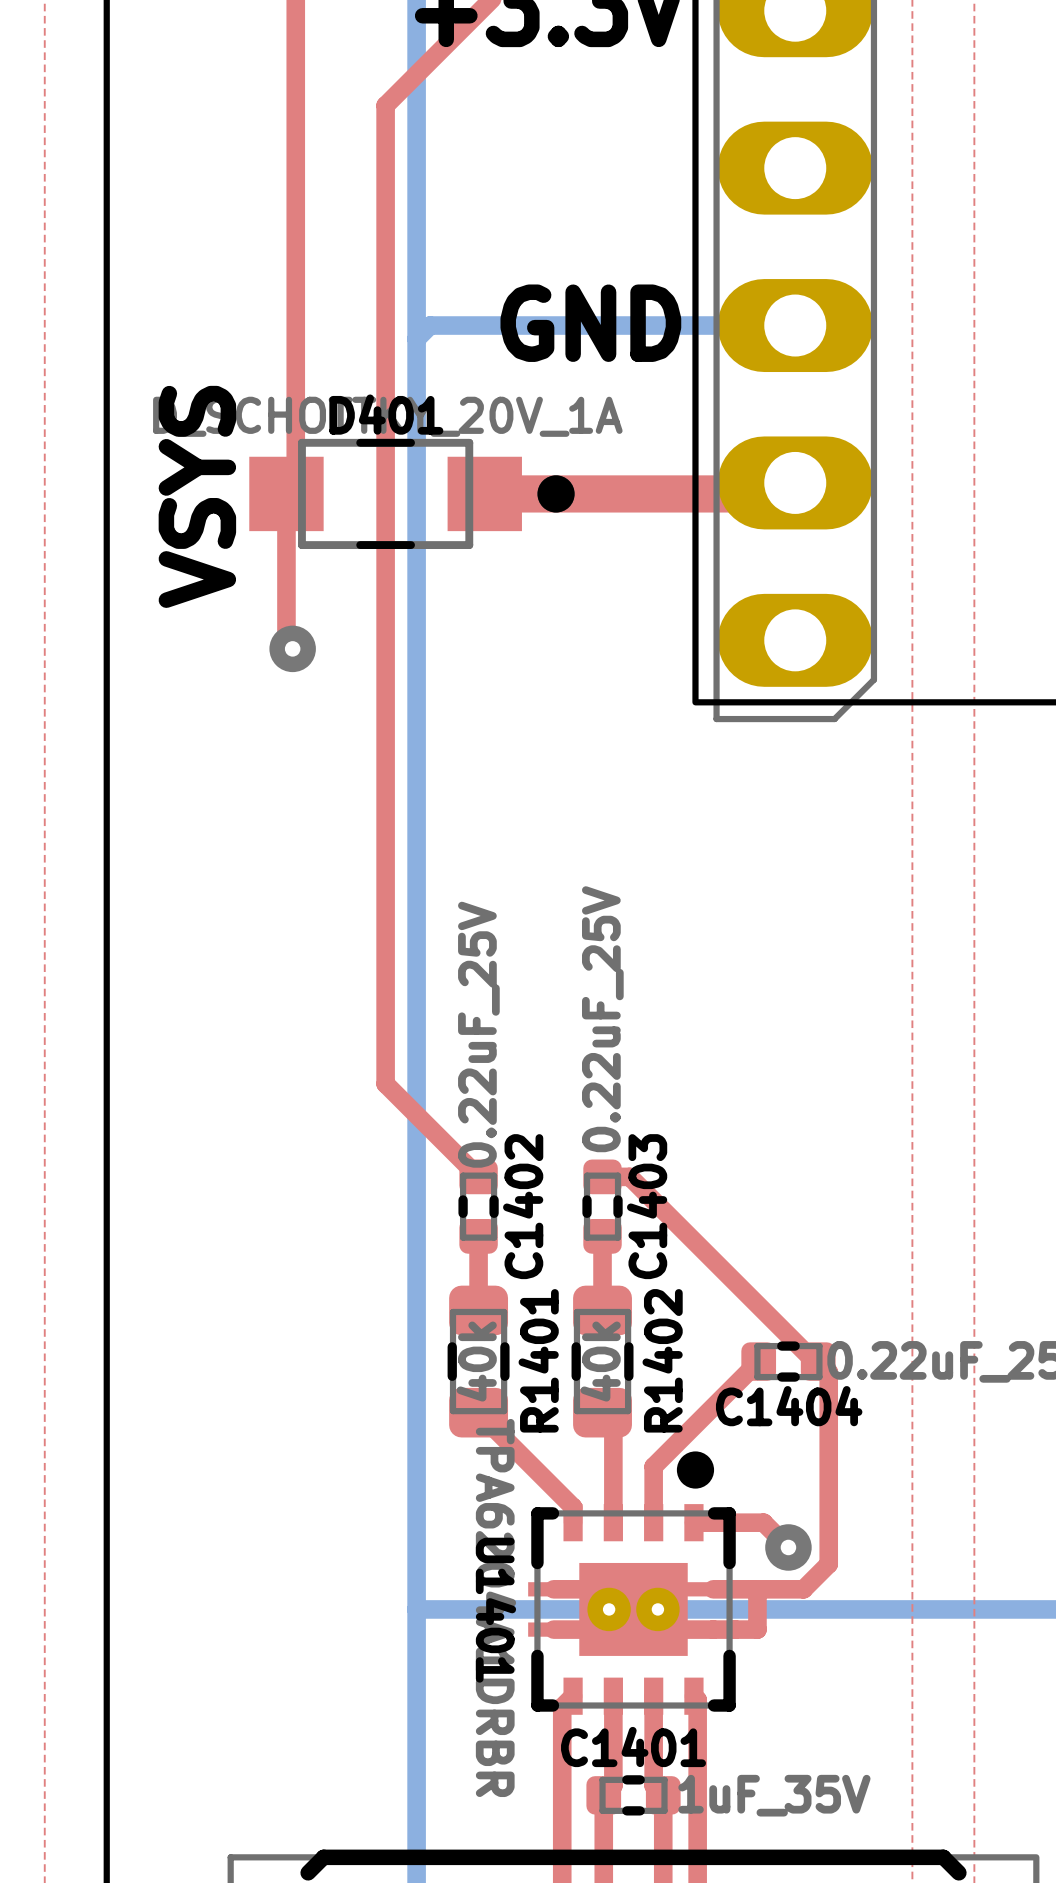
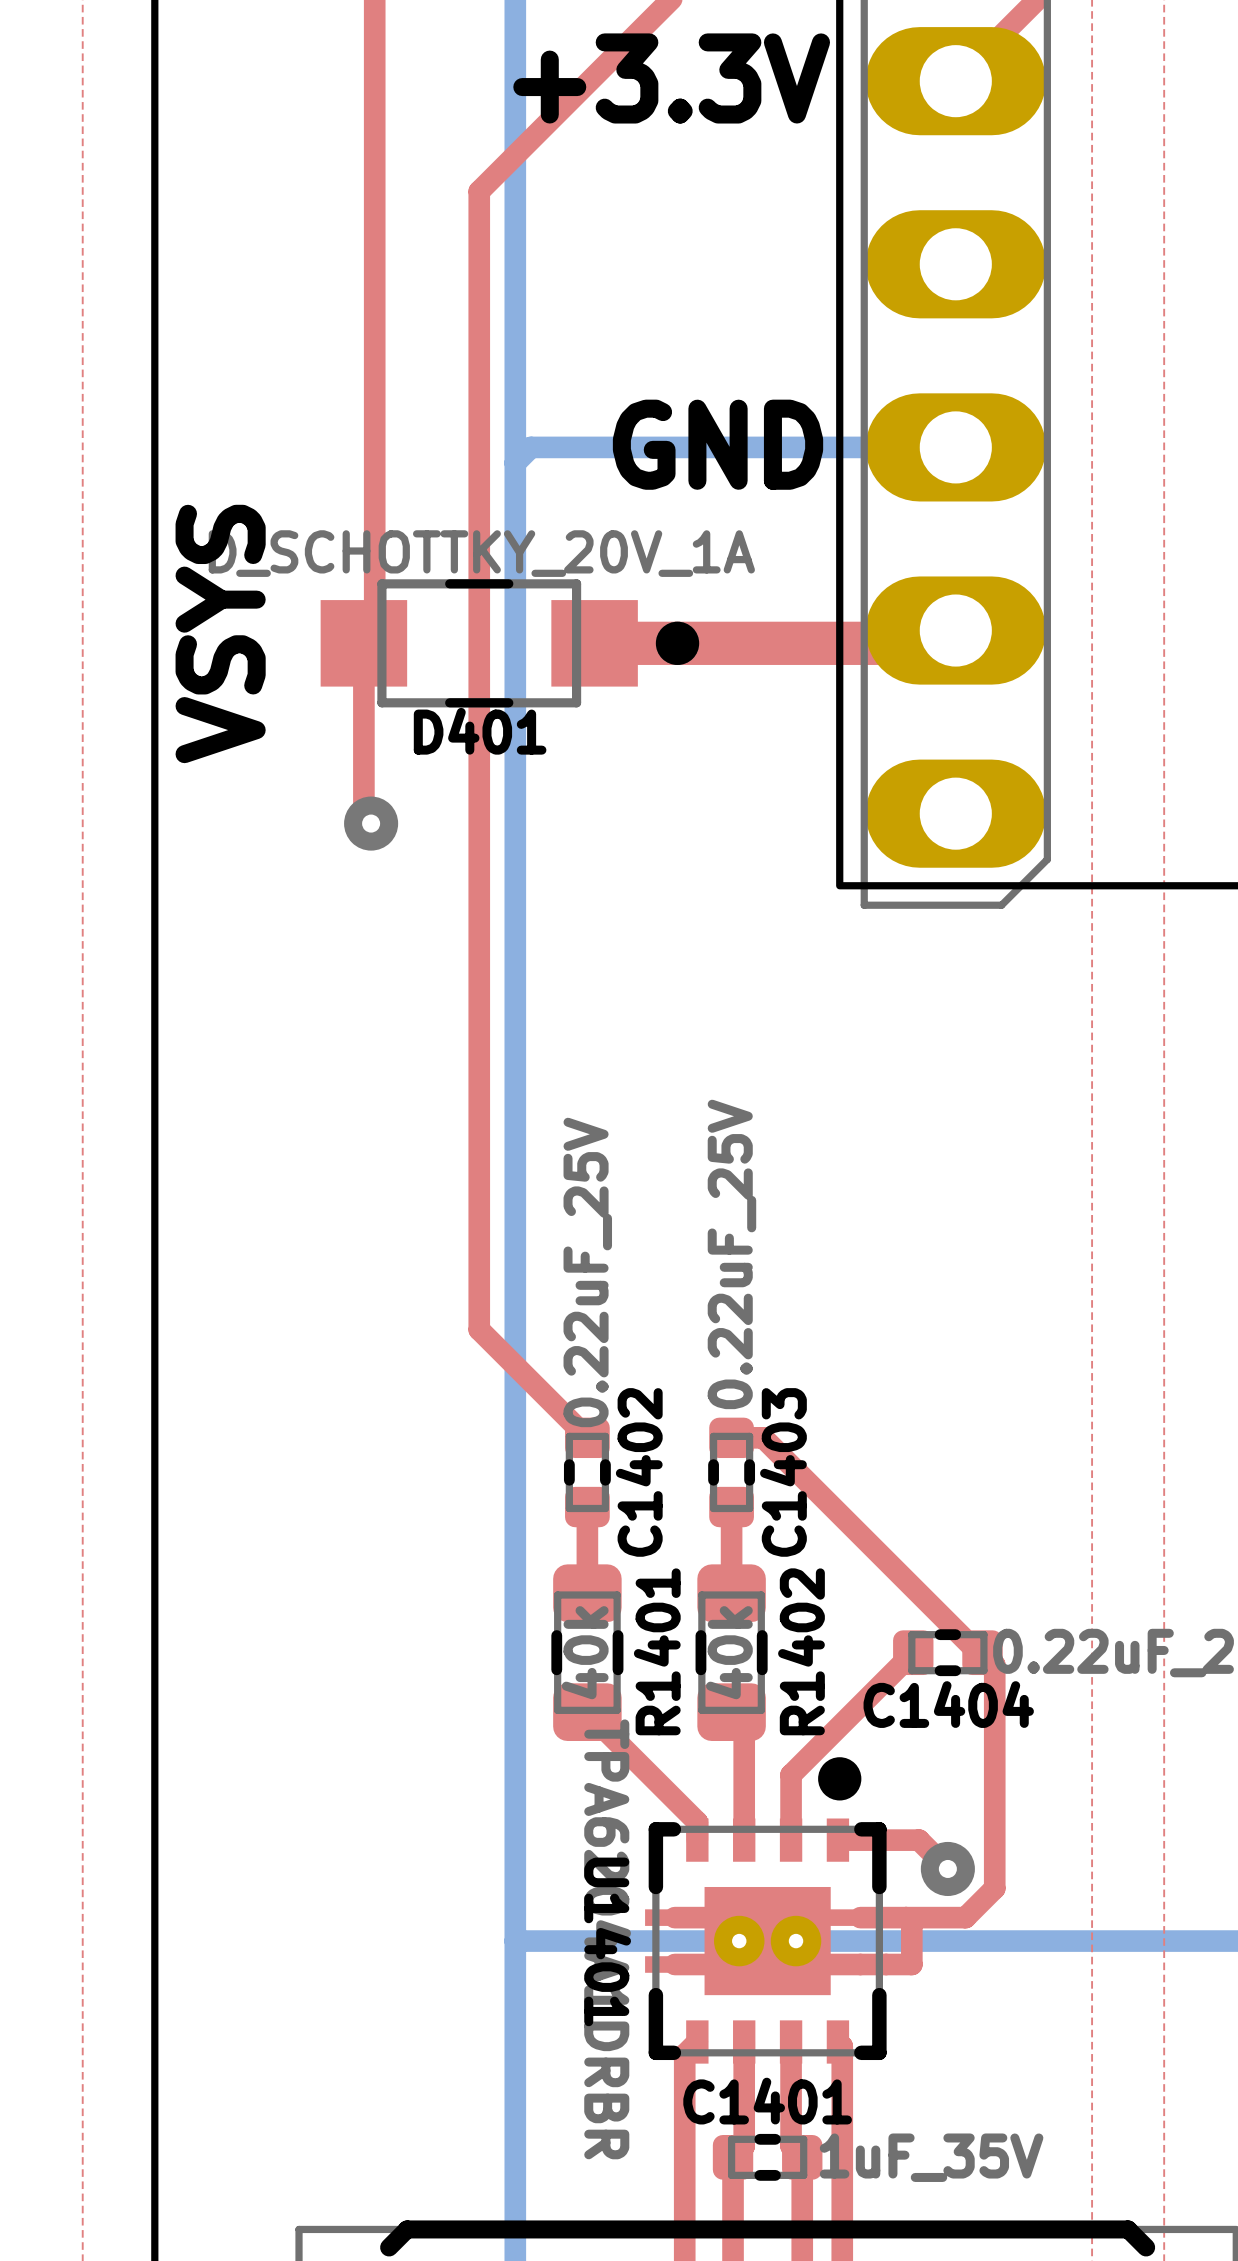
D401 name position: D401 (386, 414) -> D401 (480, 731)
text position: VSYS (197, 496) -> VSYS (220, 633)

